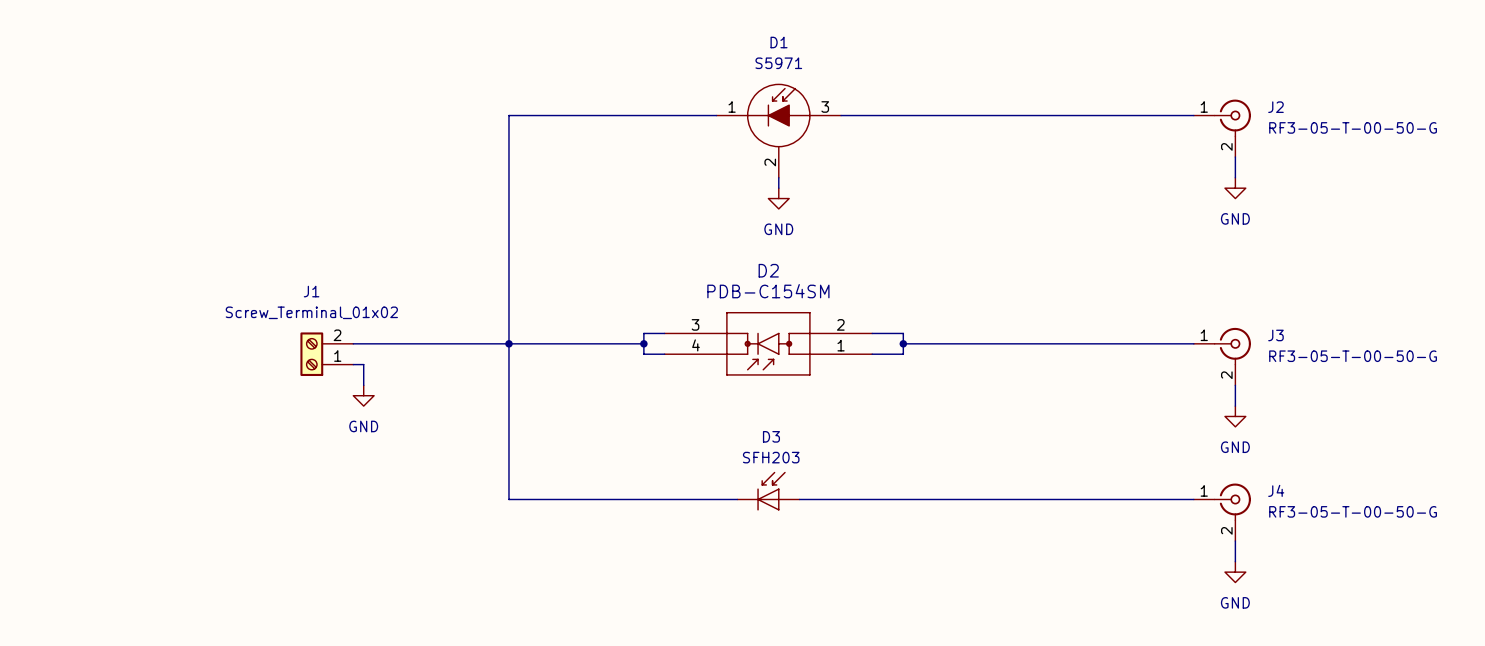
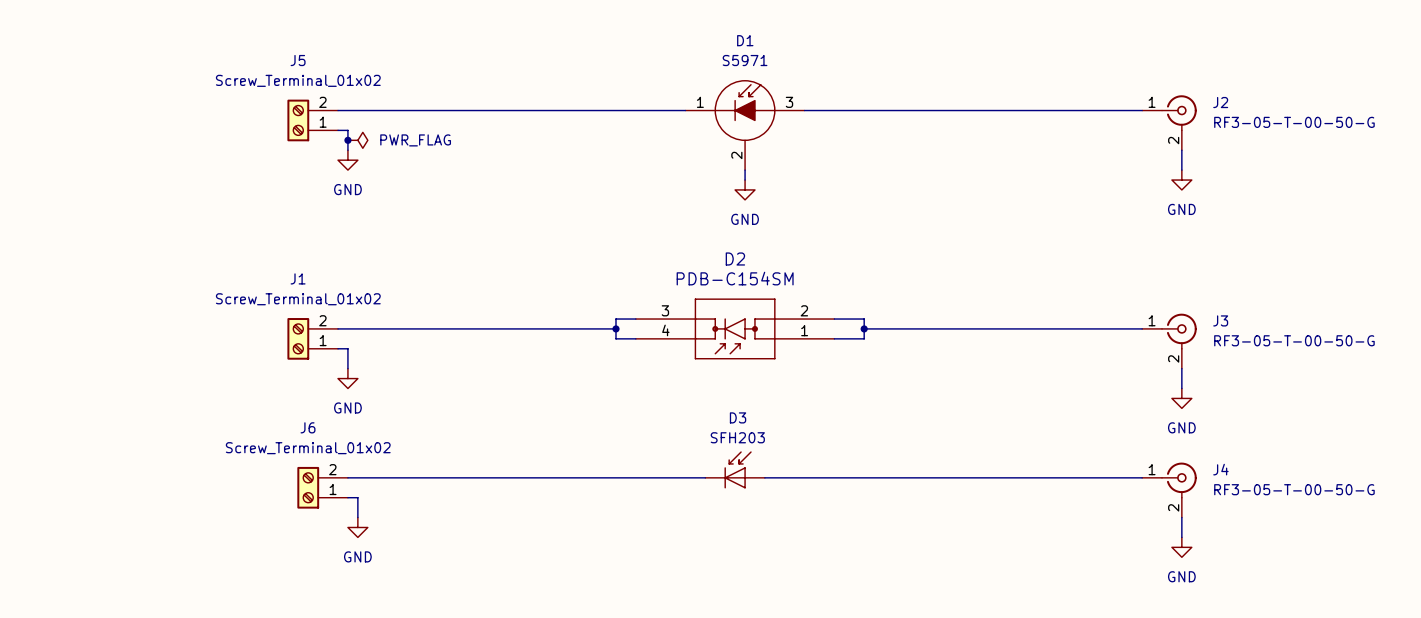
wire: none -> (338, 110) (486, 110)
wire: (508, 115) (508, 499) -> (347, 477) (486, 477)
J5: none -> Screw_Terminal_01x02 (312, 120)
wire: none -> (338, 130) (347, 130) (347, 150)
junction: none -> (347, 140)
power symbol: none -> PWR_FLAG (357, 140)
power symbol: none -> GND (347, 160)
junction: (508, 343) -> none
J6: none -> Screw_Terminal_01x02 (322, 487)
wire: none -> (347, 497) (357, 497) (357, 517)
power symbol: none -> GND (357, 527)

